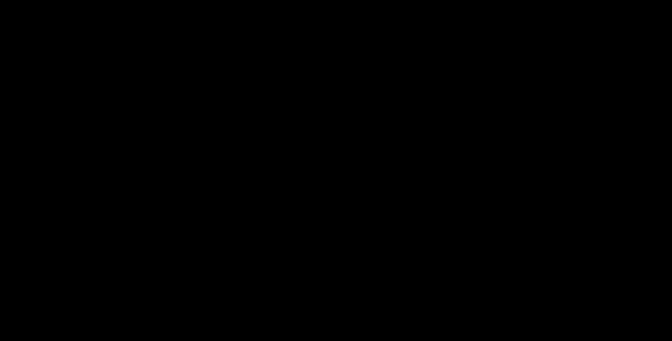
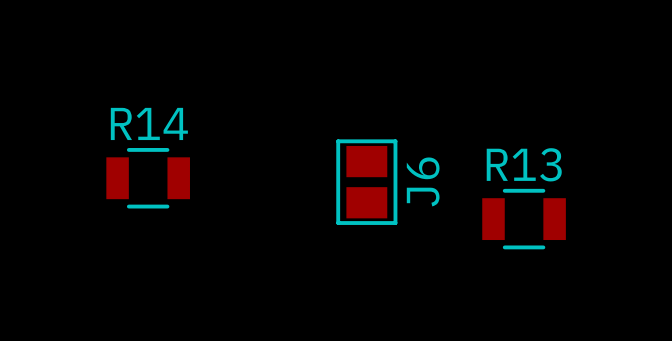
R14: none -> (148, 178)
J6: none -> (366, 182)
R13: none -> (524, 219)

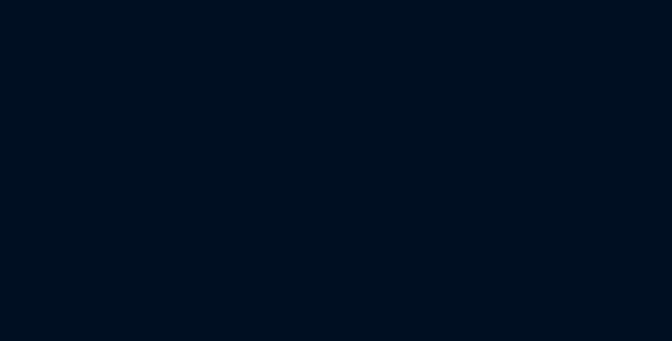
R14: (148, 178) -> none
J6: (366, 182) -> none
R13: (524, 219) -> none

